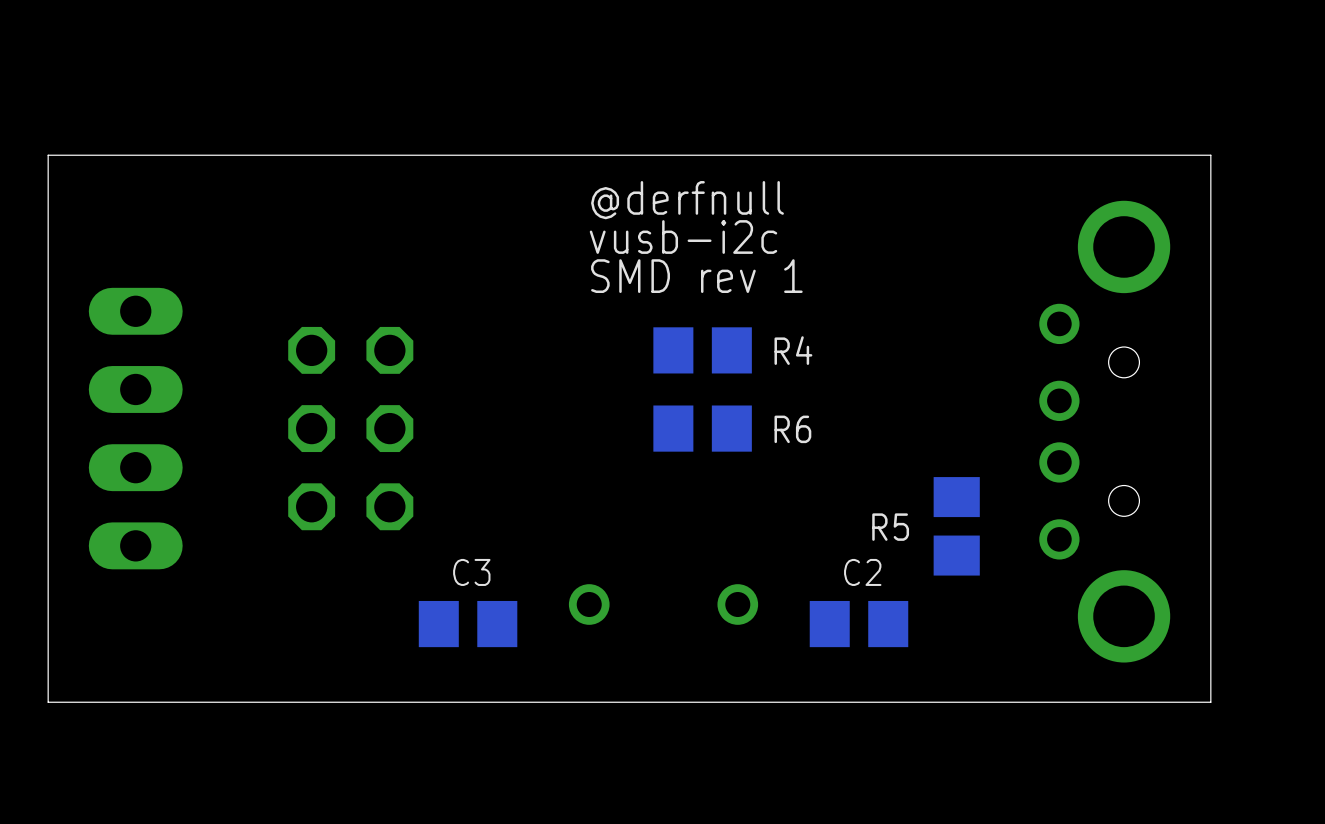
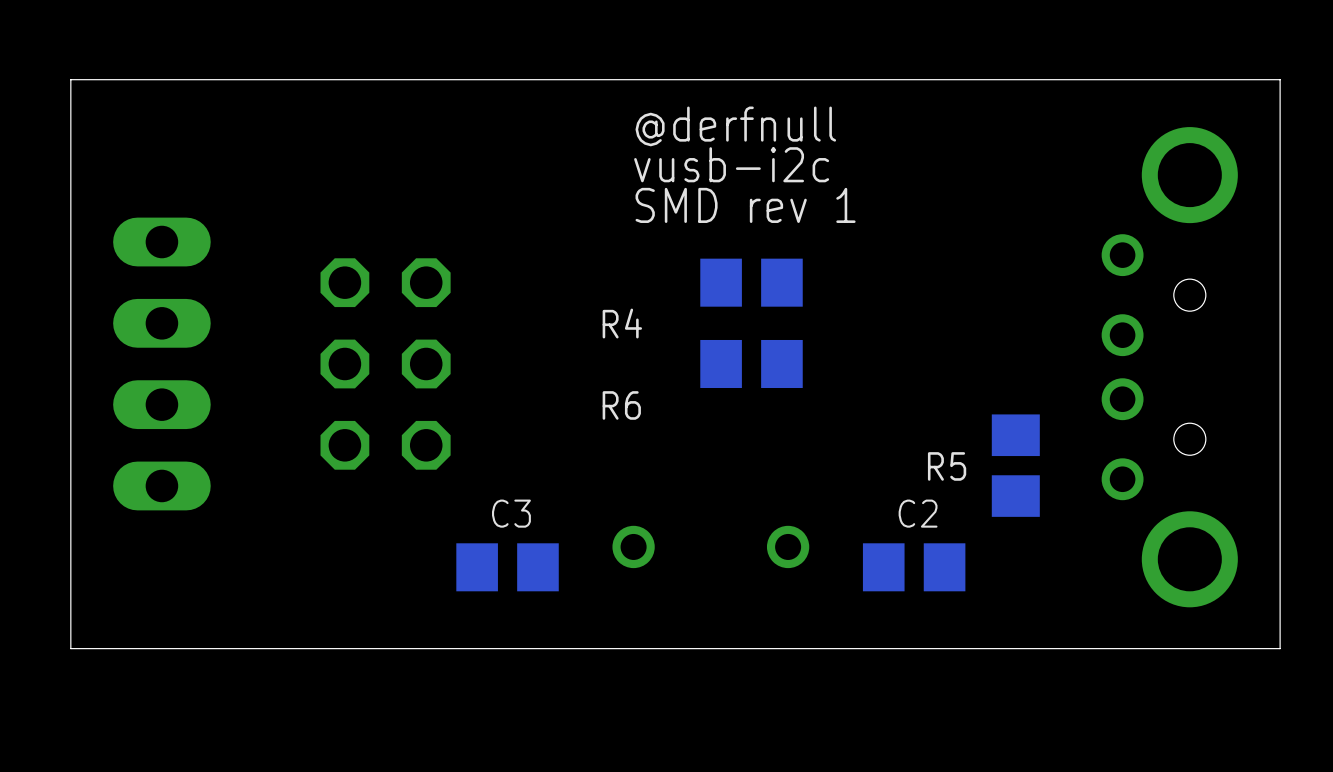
R4 name position: R4 (793, 350) -> R4 (622, 323)
R6 name position: R6 (792, 429) -> R6 (621, 405)

